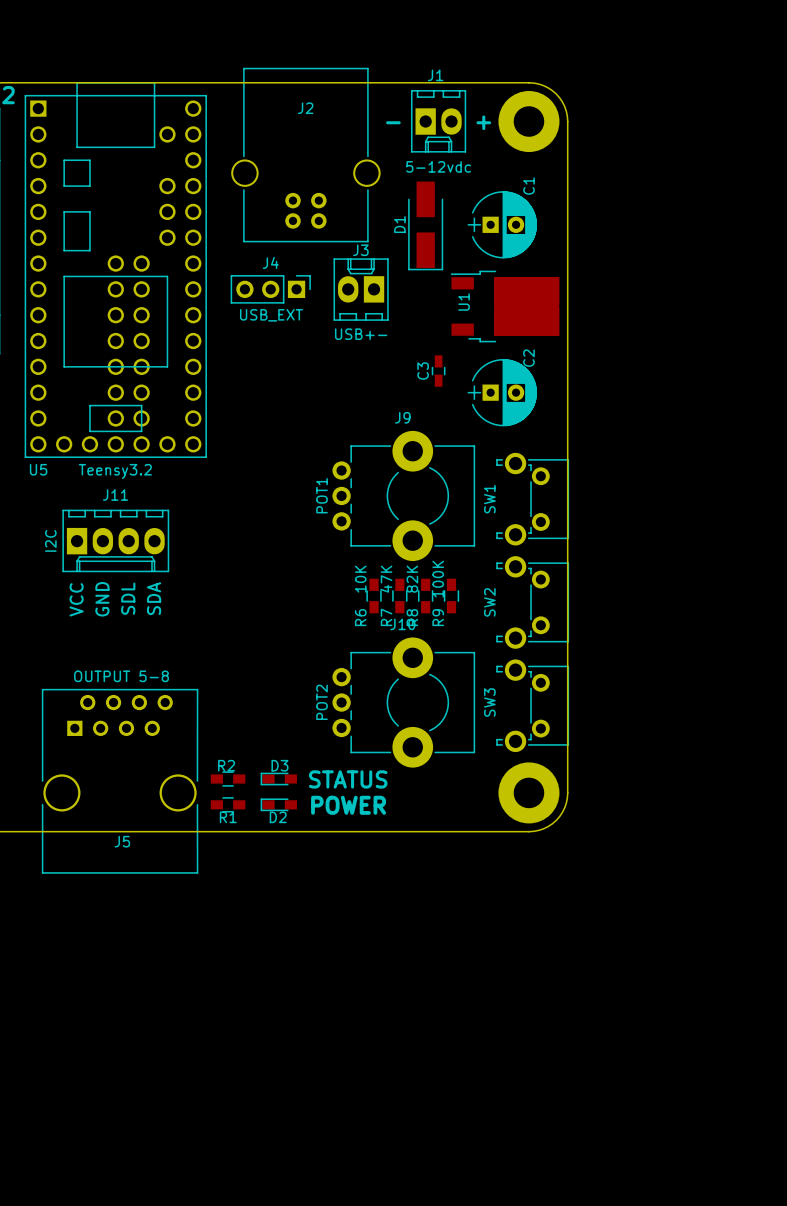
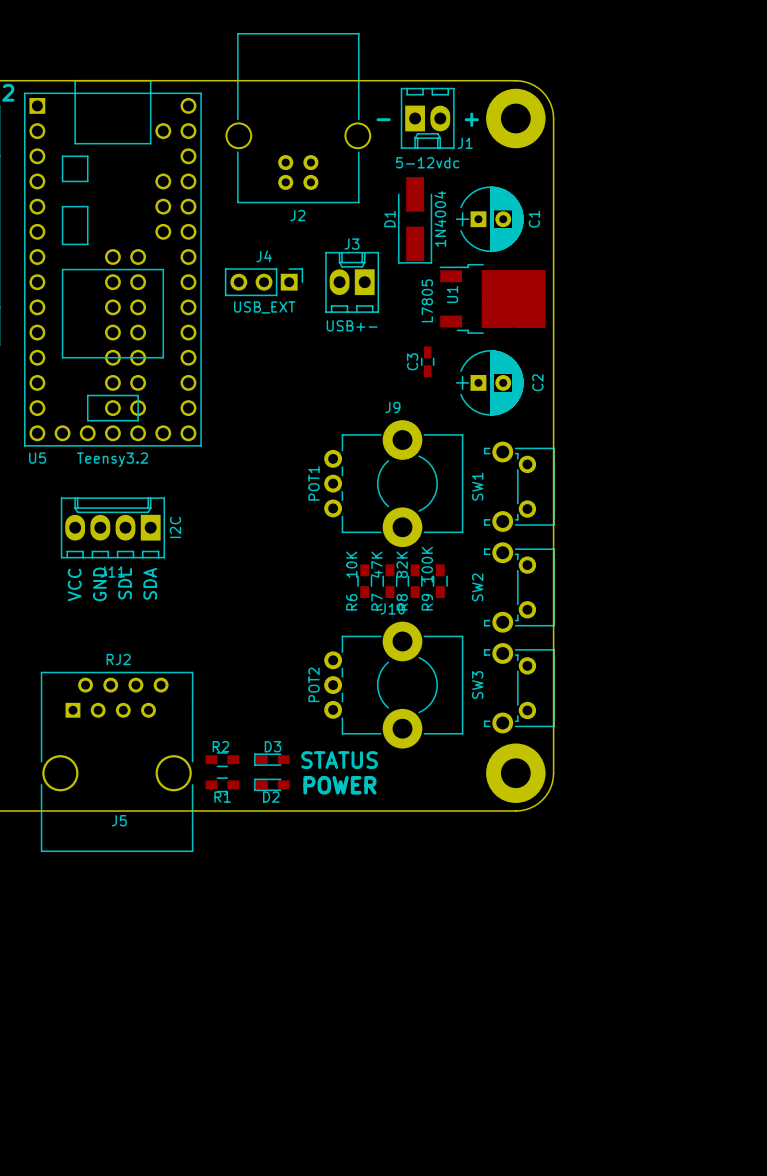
J1 name position: J1 (435, 75) -> J1 (465, 143)
J2 name position: J2 (305, 108) -> J2 (297, 215)
J2 position: (305, 155) -> (298, 118)
C1 name position: C1 (529, 186) -> C1 (534, 219)
D1 value: none -> 1N4004 (440, 218)
U1 value: none -> L7805 (427, 300)
C2 name position: C2 (529, 358) -> C2 (537, 382)
J11 rotation: 0° (115, 540) -> 180° (112, 527)
J5 value: OUTPUT 5-8 (121, 676) -> RJ2 (118, 659)

